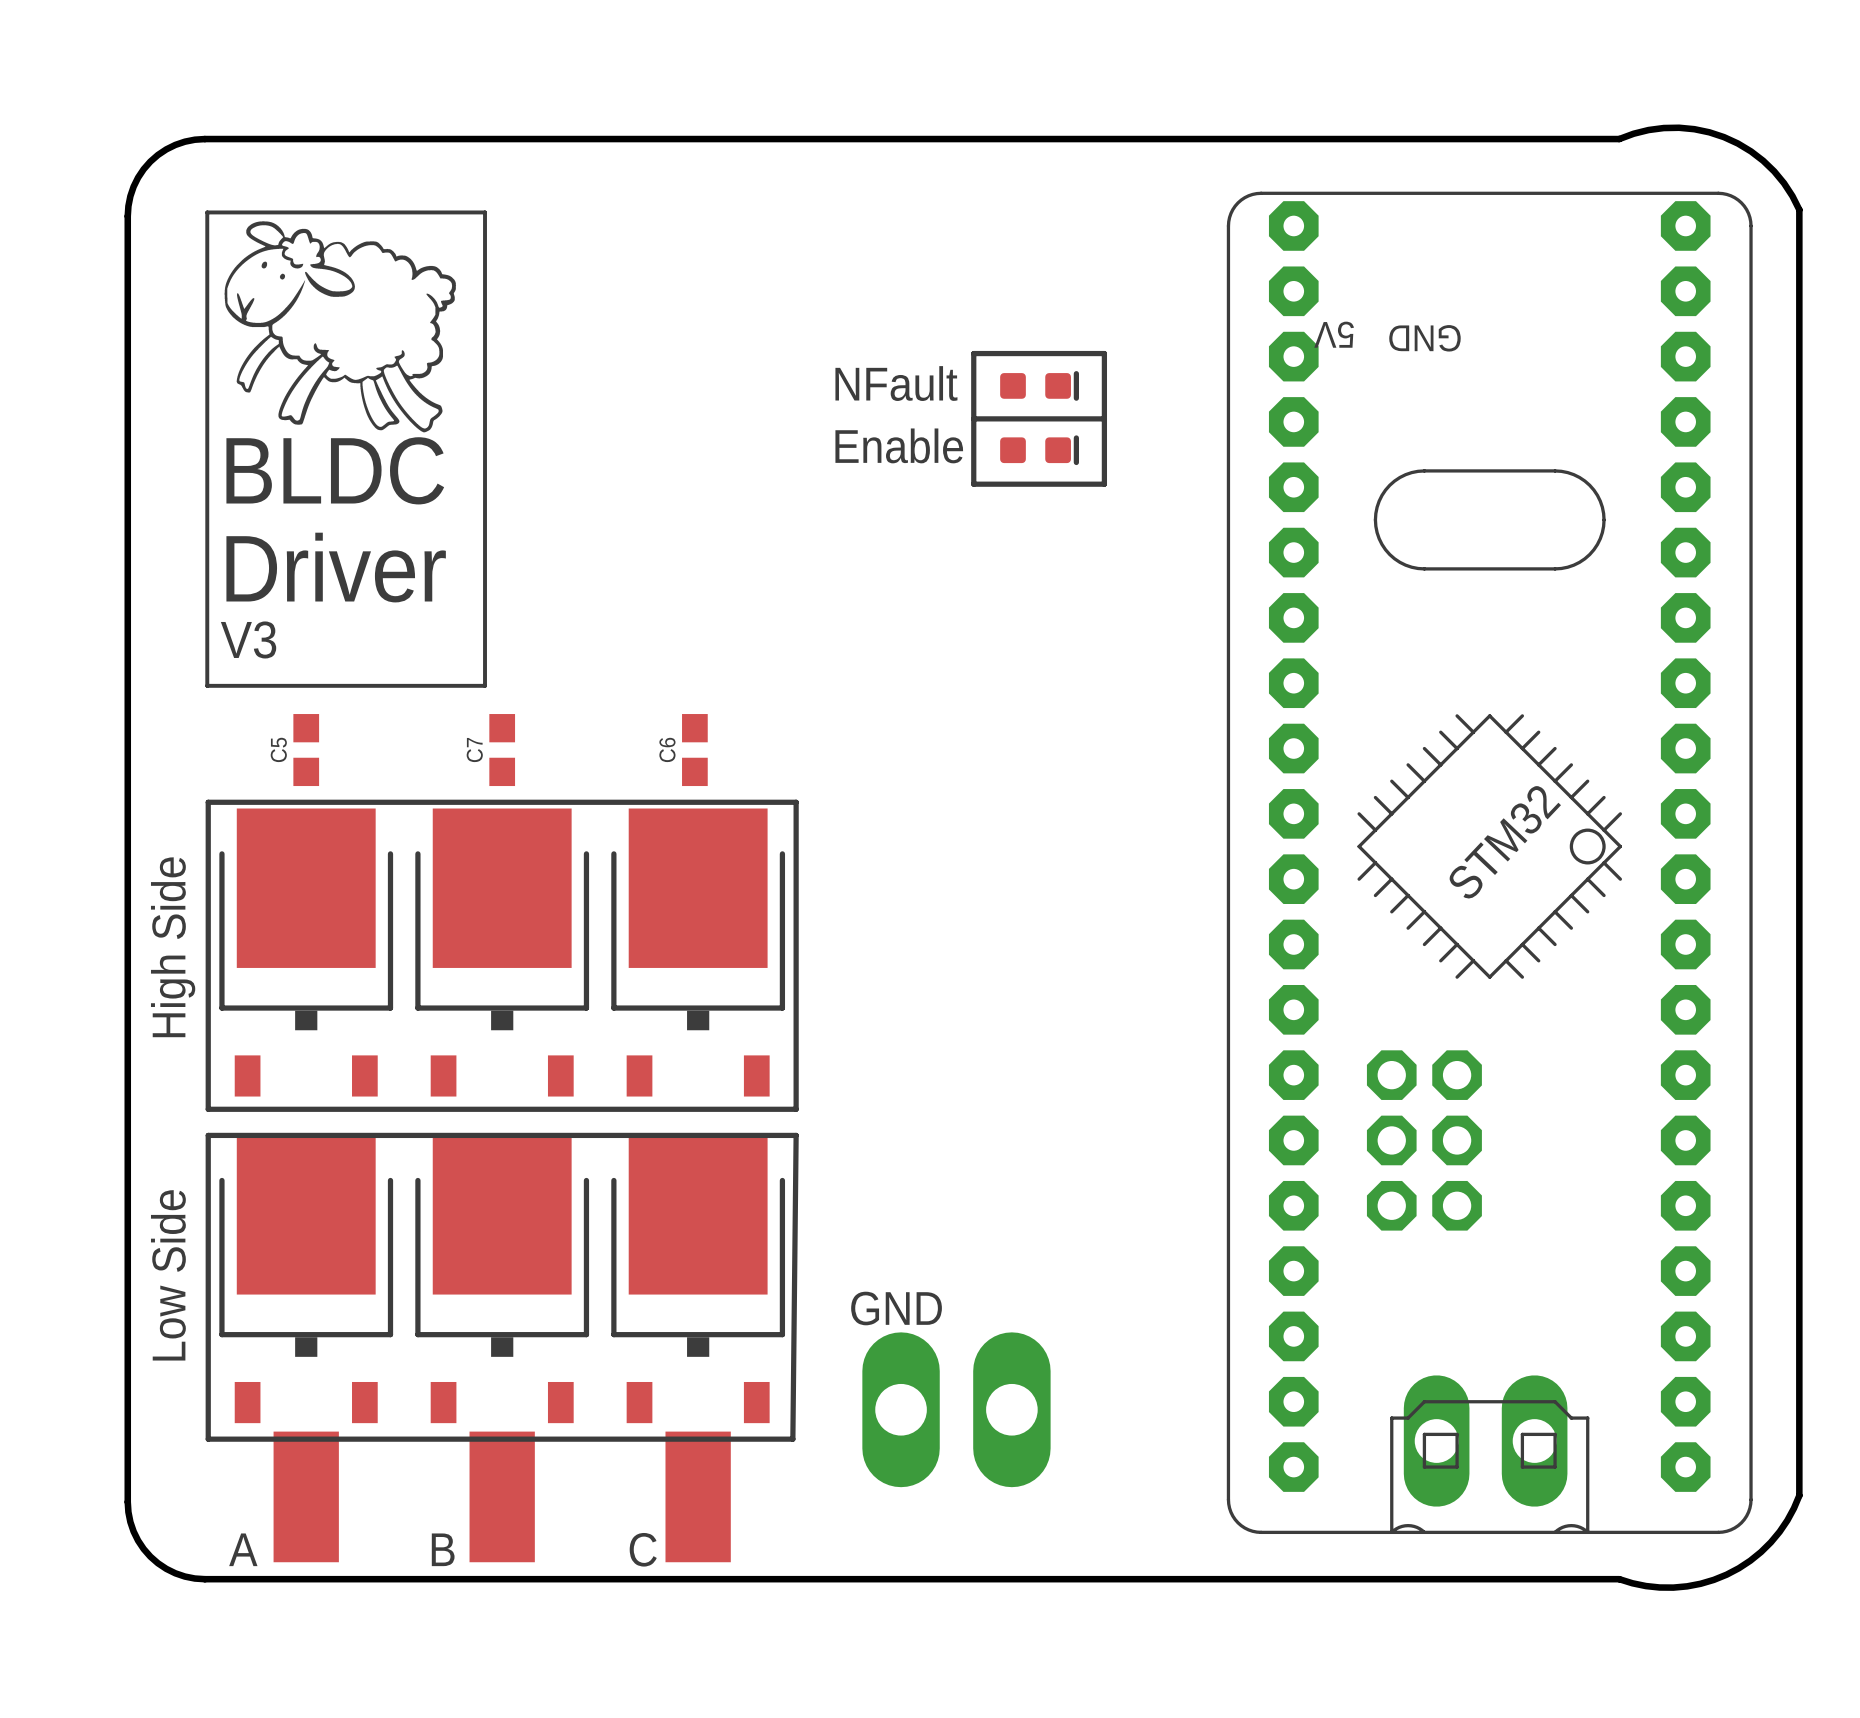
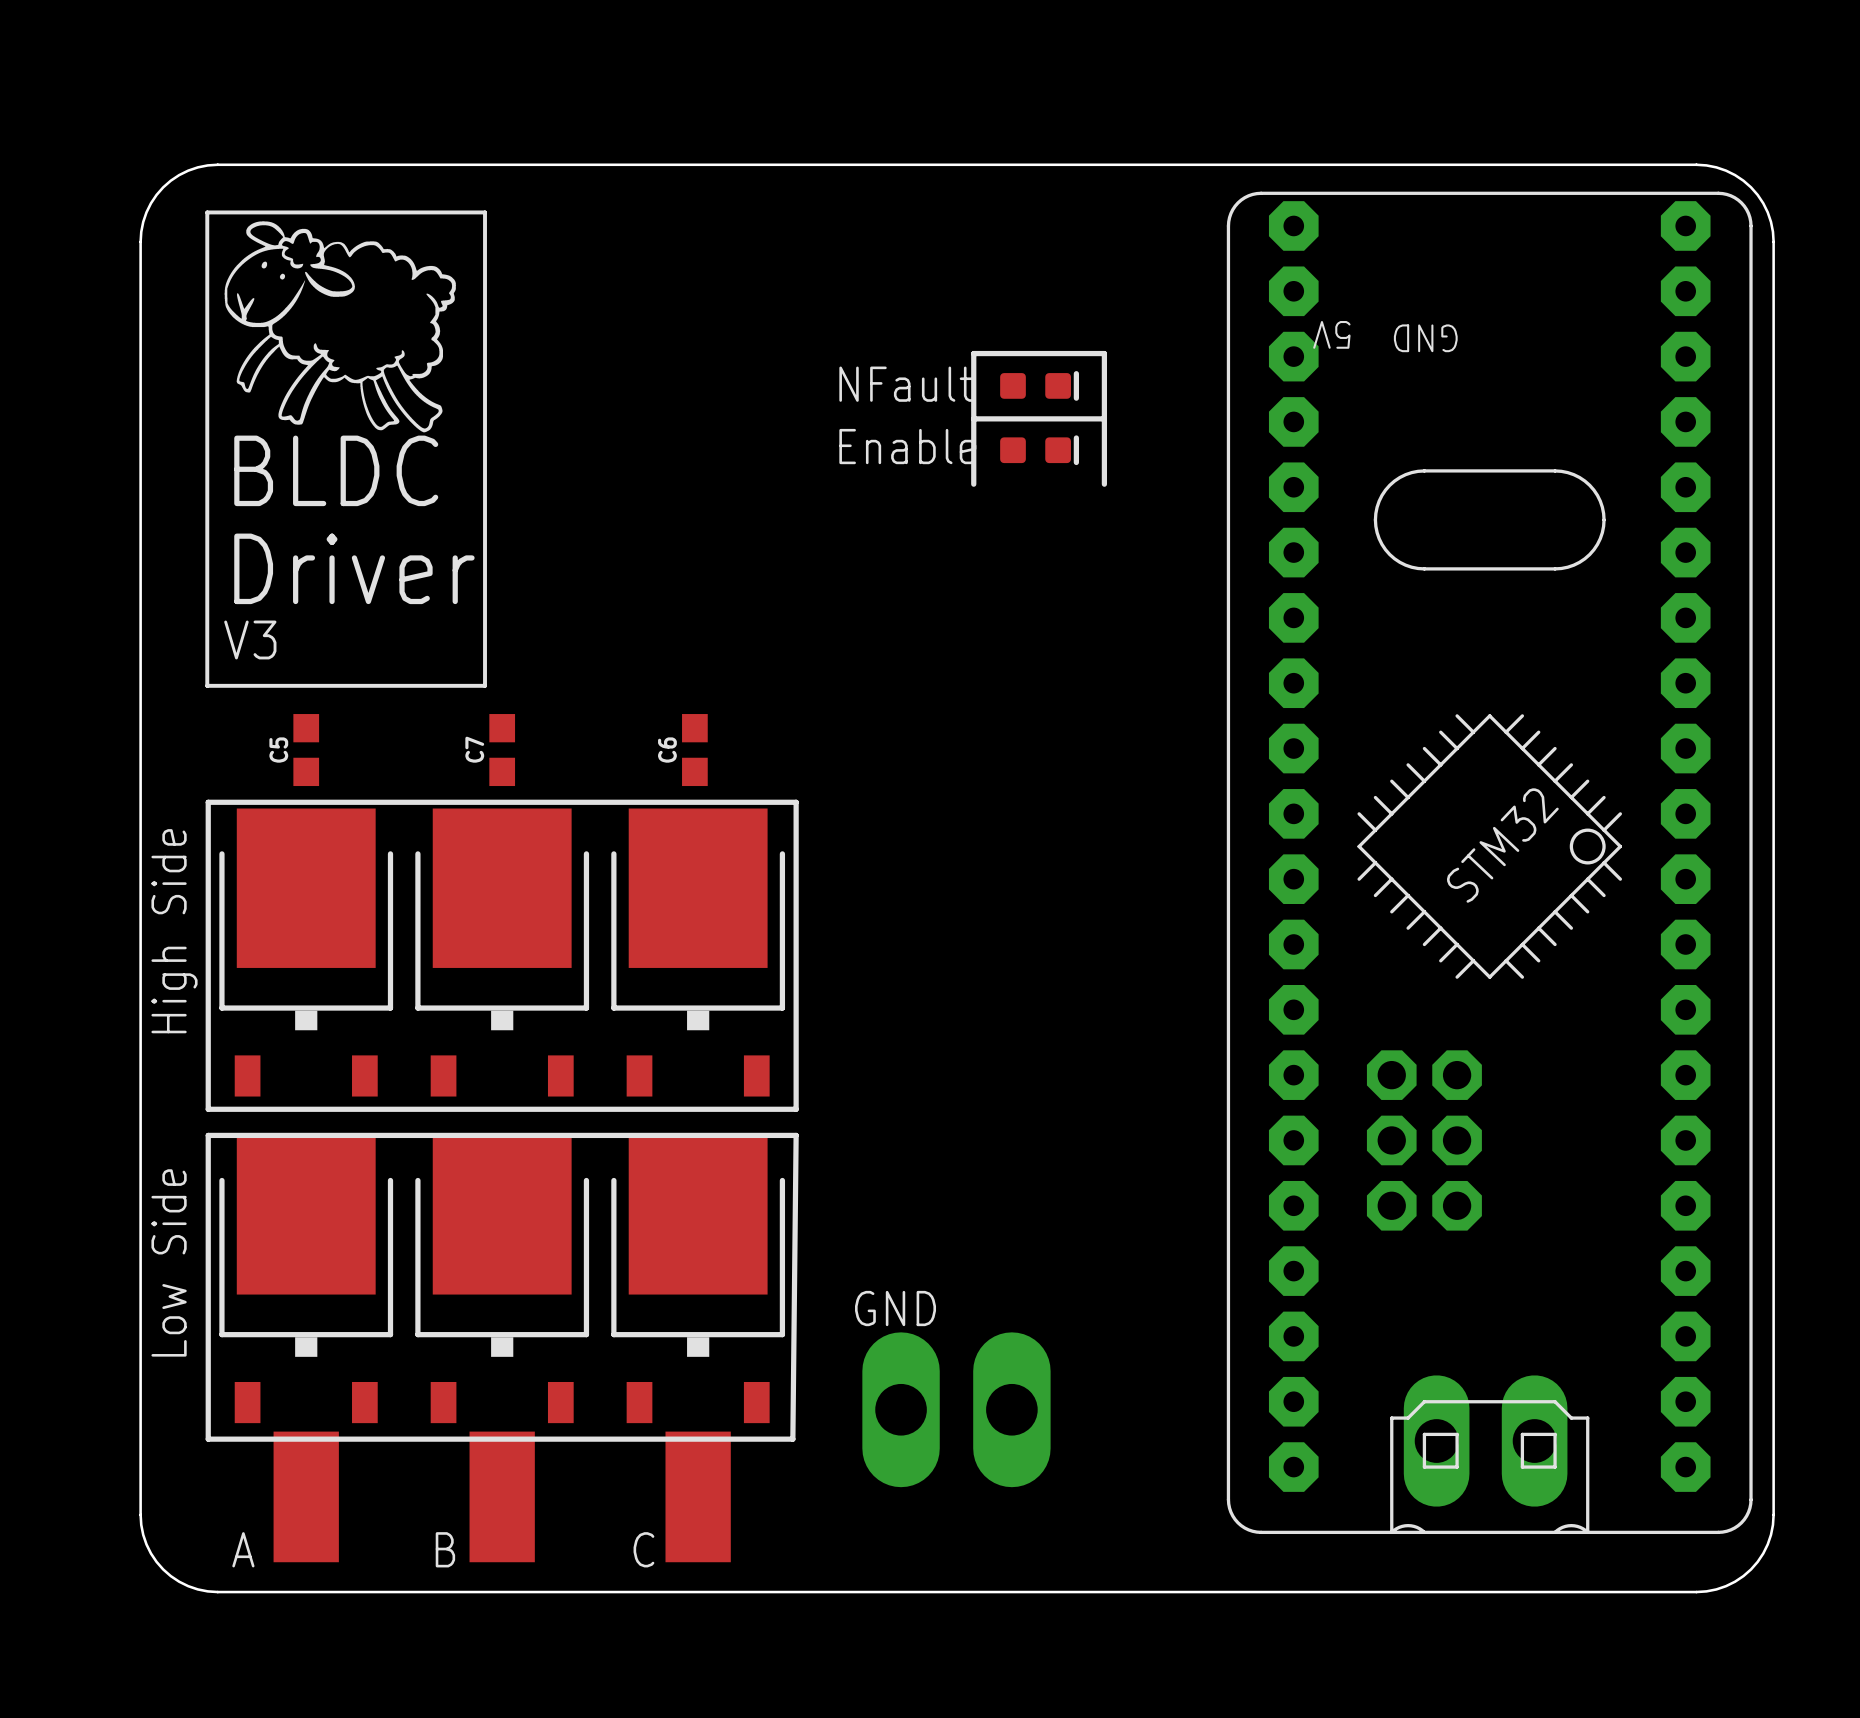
board edge: (204, 139) (1619, 139) (1648, 130) (1679, 127) (1709, 132) (1723, 137) (1737, 143) (1763, 160) (1784, 183) (1799, 209) (1799, 1495) (1787, 1520) (1770, 1542) (1750, 1560) (1726, 1574) (1700, 1583) (1673, 1587) (1645, 1586) (1619, 1579) (204, 1579) (175, 1573) (150, 1556) (133, 1531) (127, 1502) (127, 216) (133, 186) (150, 161) (175, 144) (204, 139) -> (217, 164) (188, 170) (163, 187) (146, 212) (140, 241) (140, 1514) (146, 1544) (163, 1569) (188, 1586) (217, 1592) (1696, 1592) (1726, 1586) (1751, 1569) (1767, 1544) (1773, 1514) (1773, 241) (1767, 212) (1751, 187) (1726, 170) (1696, 164) (217, 164)
line: (973, 484) (1104, 484) -> none

